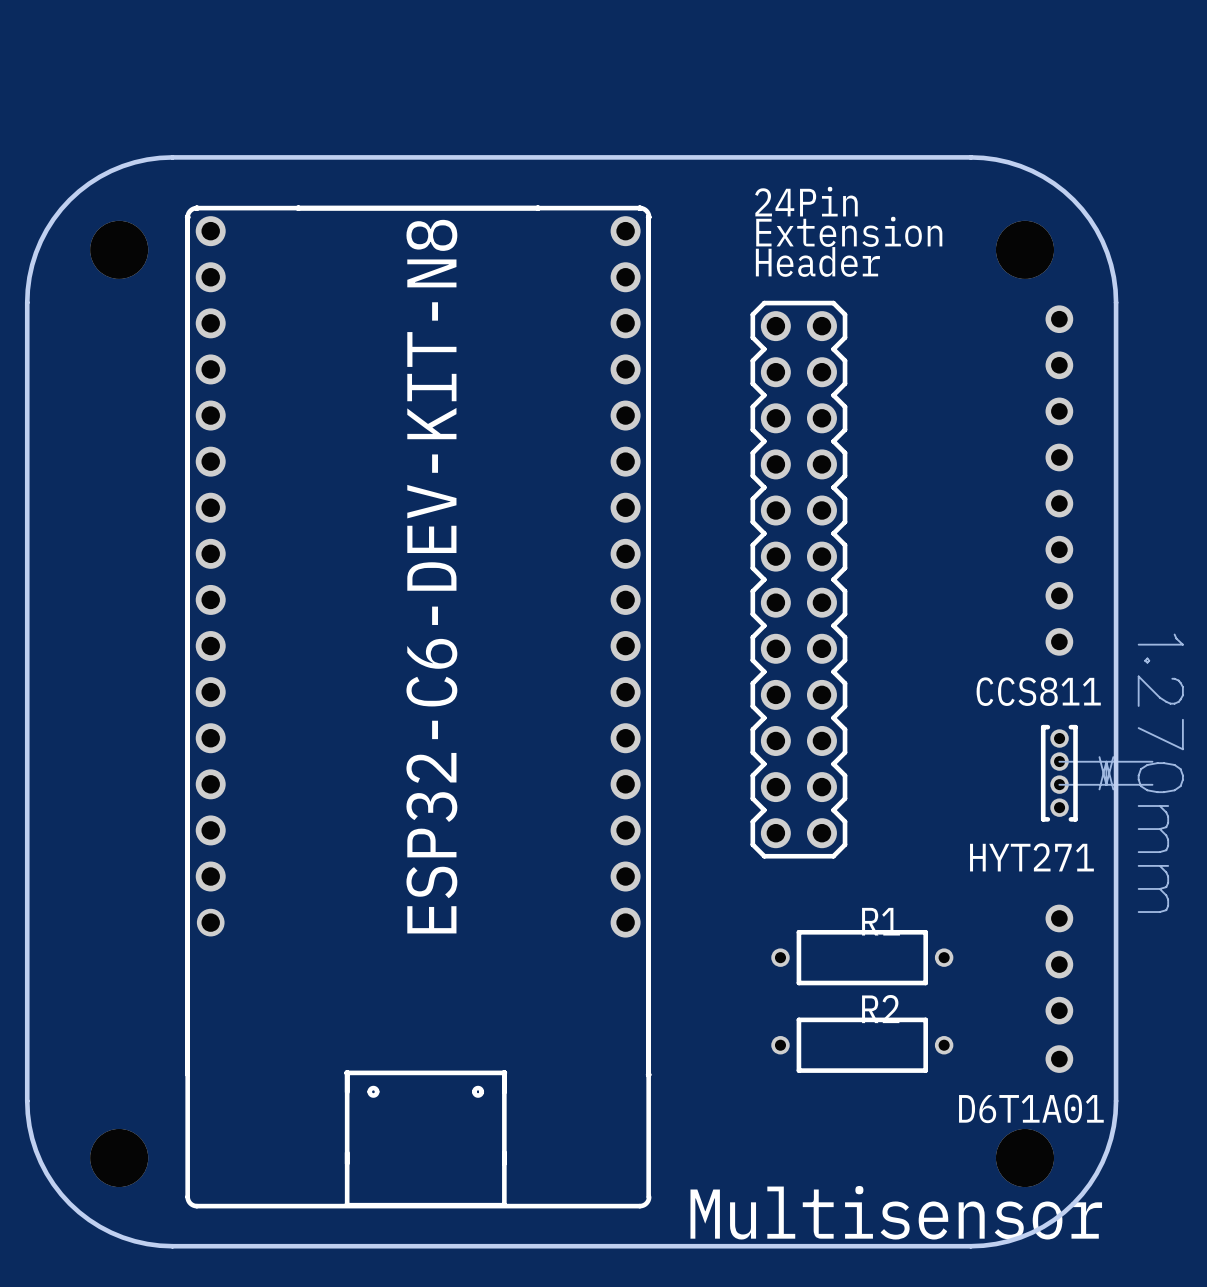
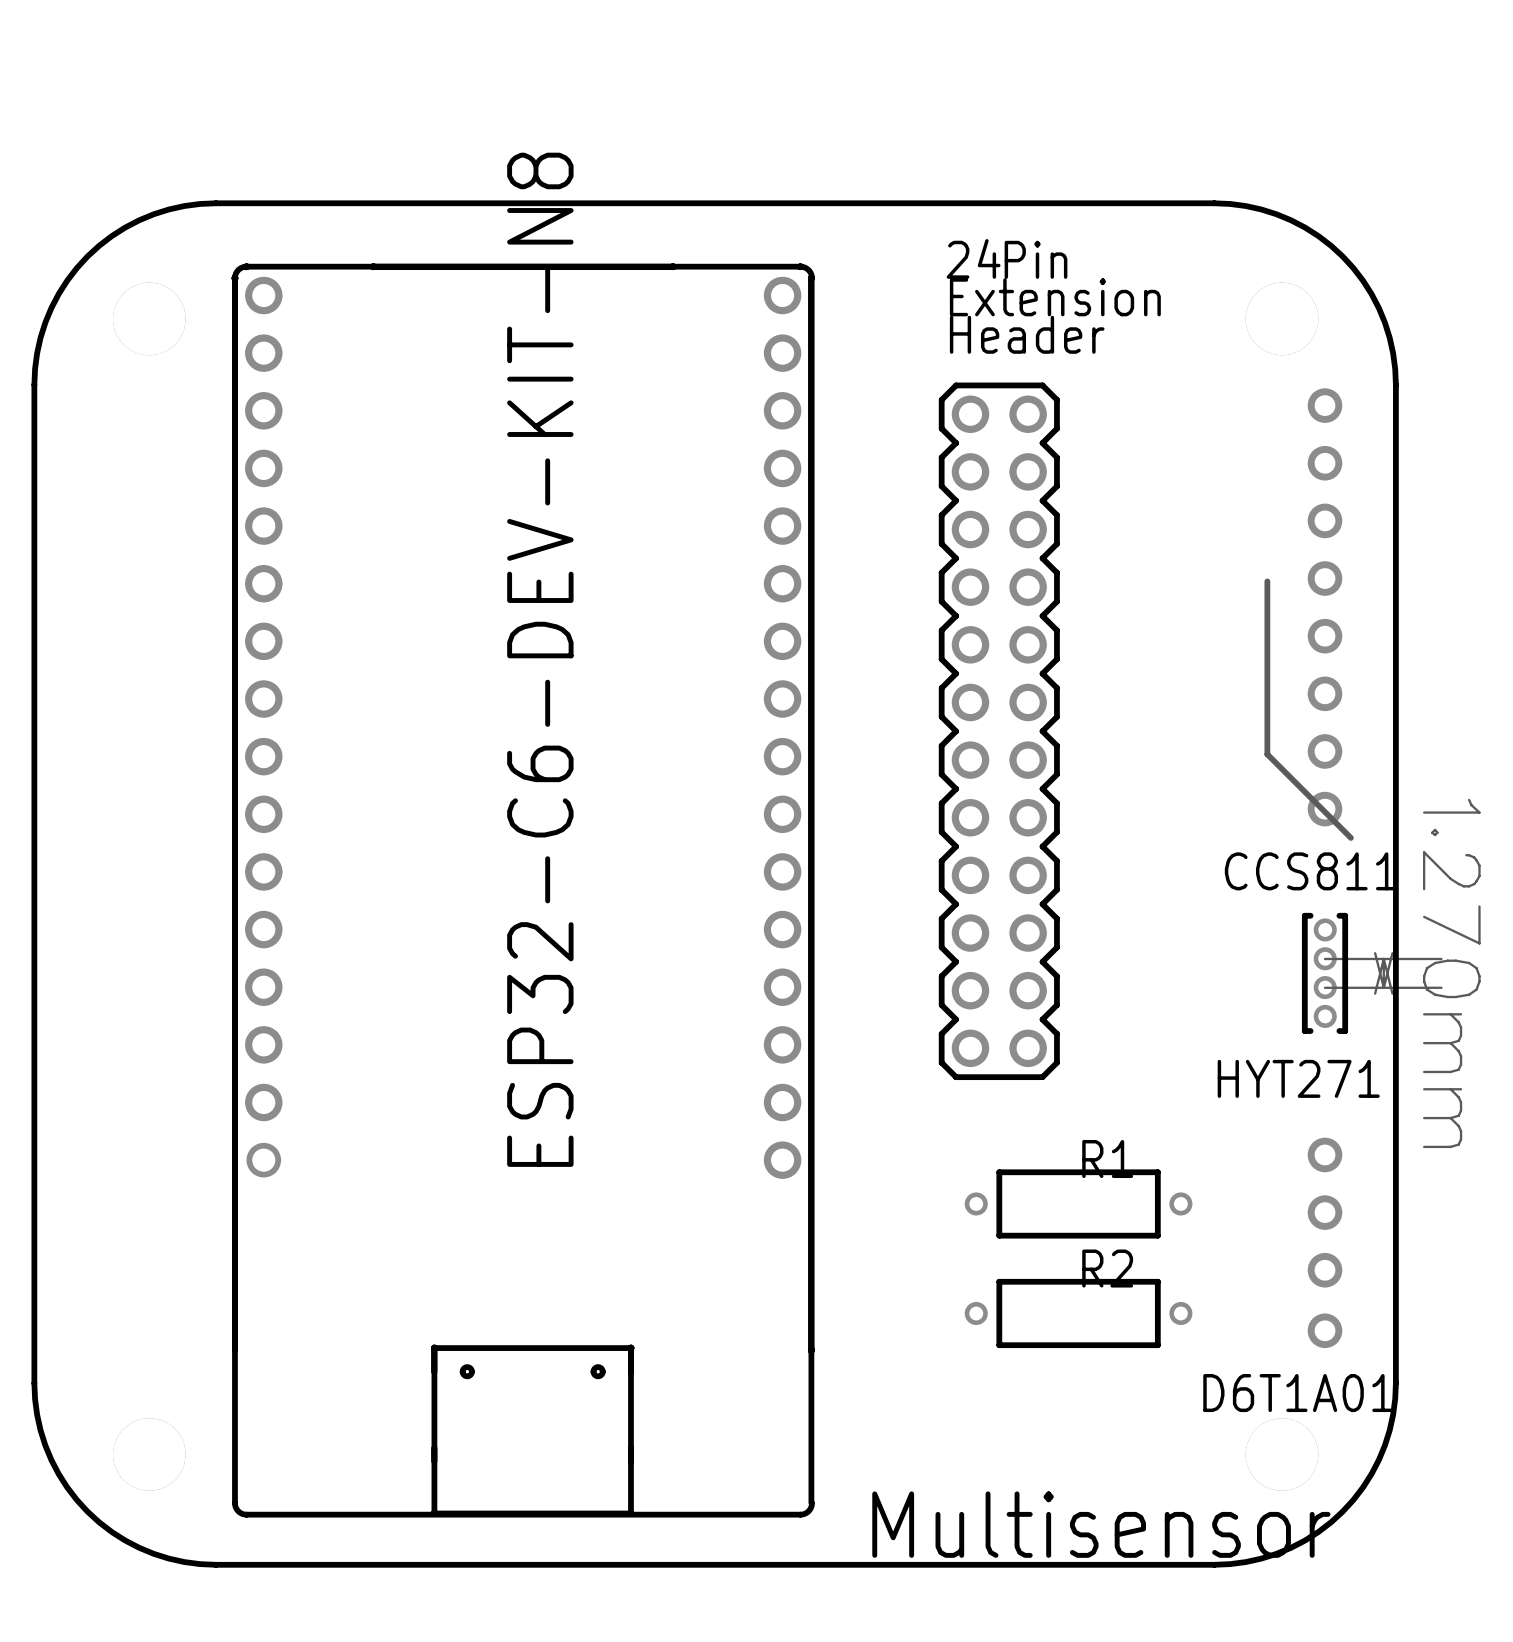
line: none -> (1267, 581) (1267, 754) (1350, 837)

